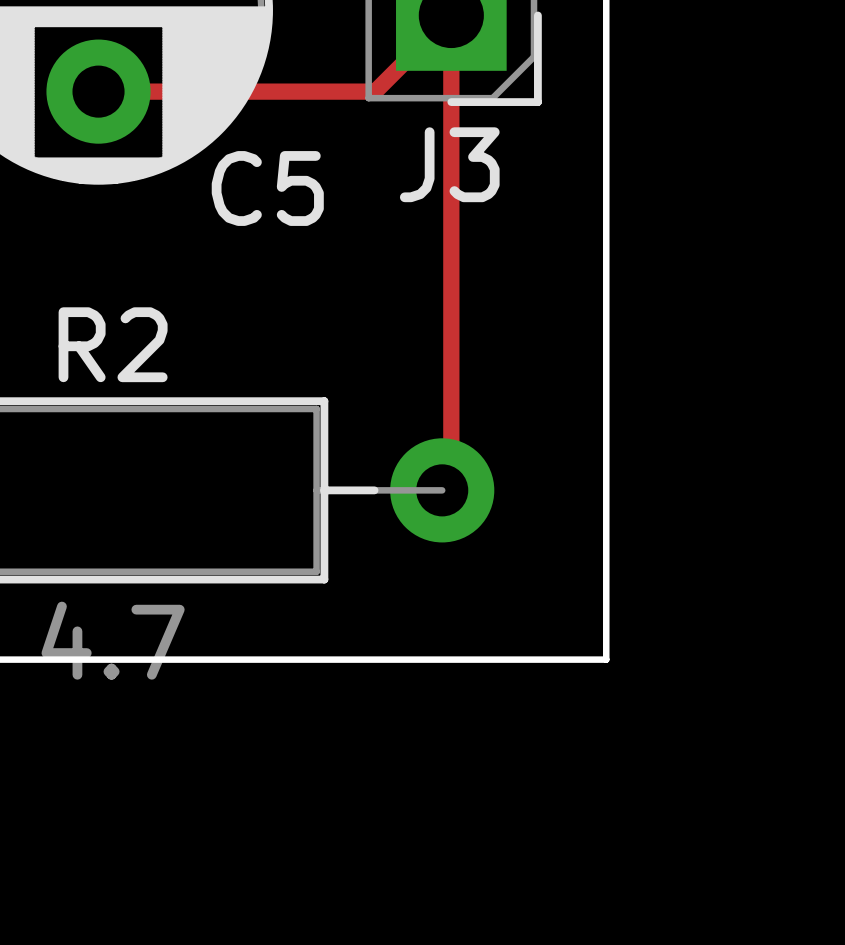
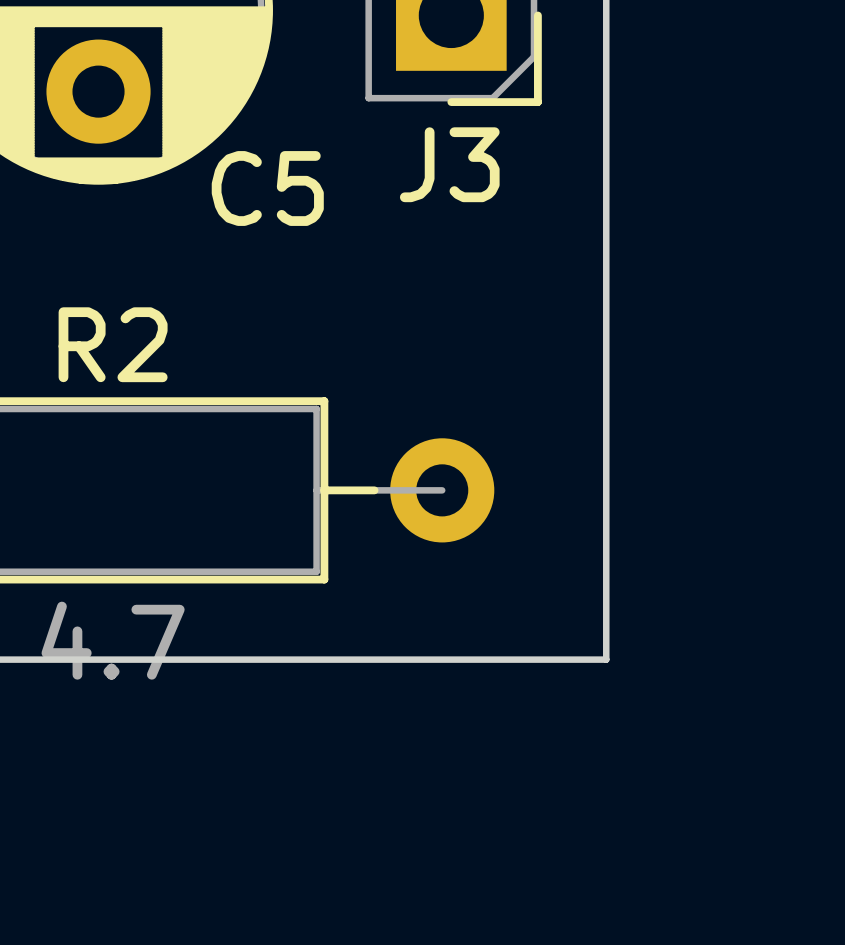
track: (98, 91) (375, 91) (451, 15) (451, 481) (442, 490) -> none

